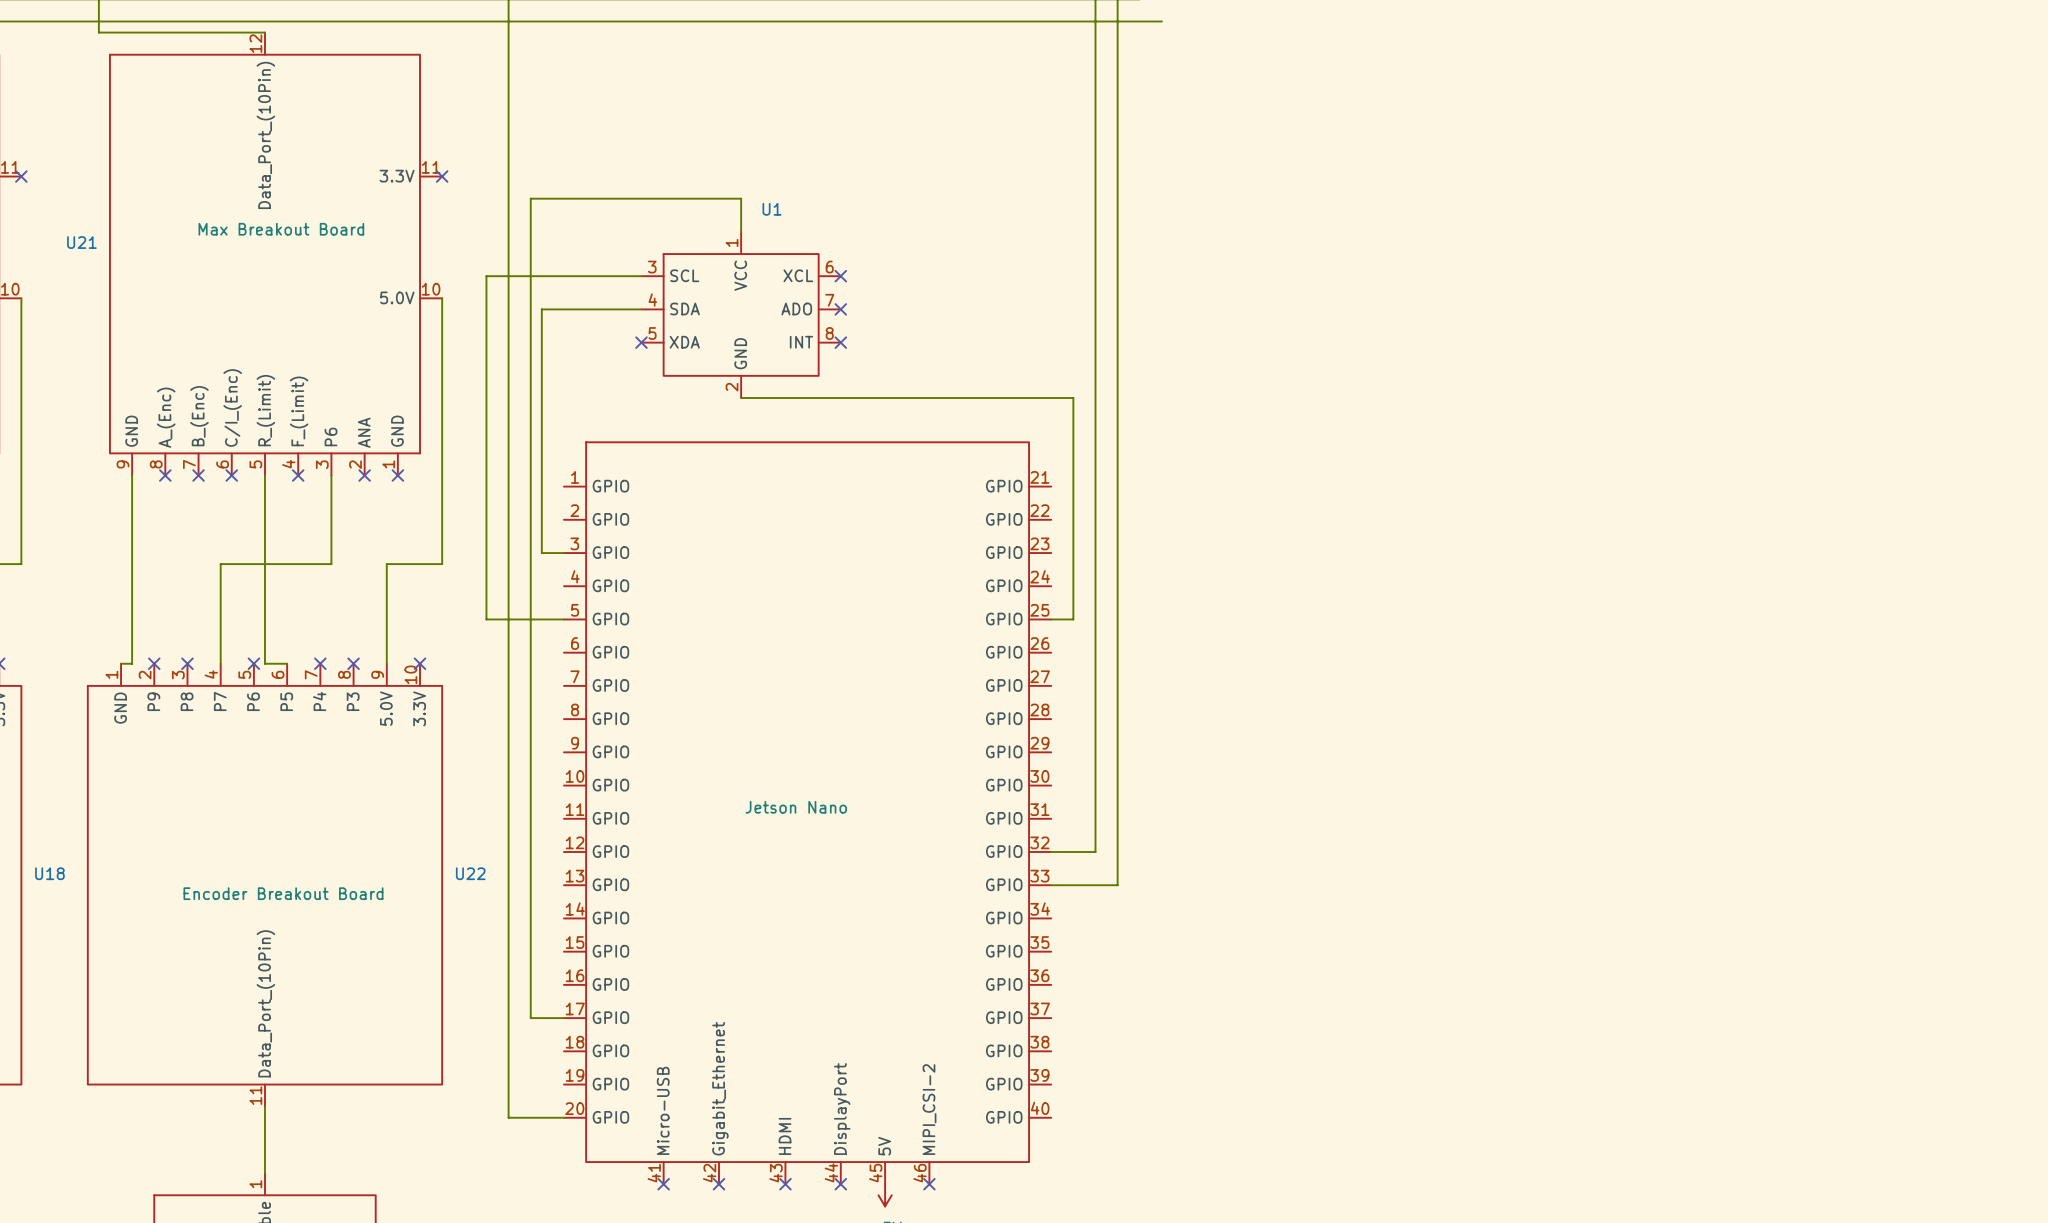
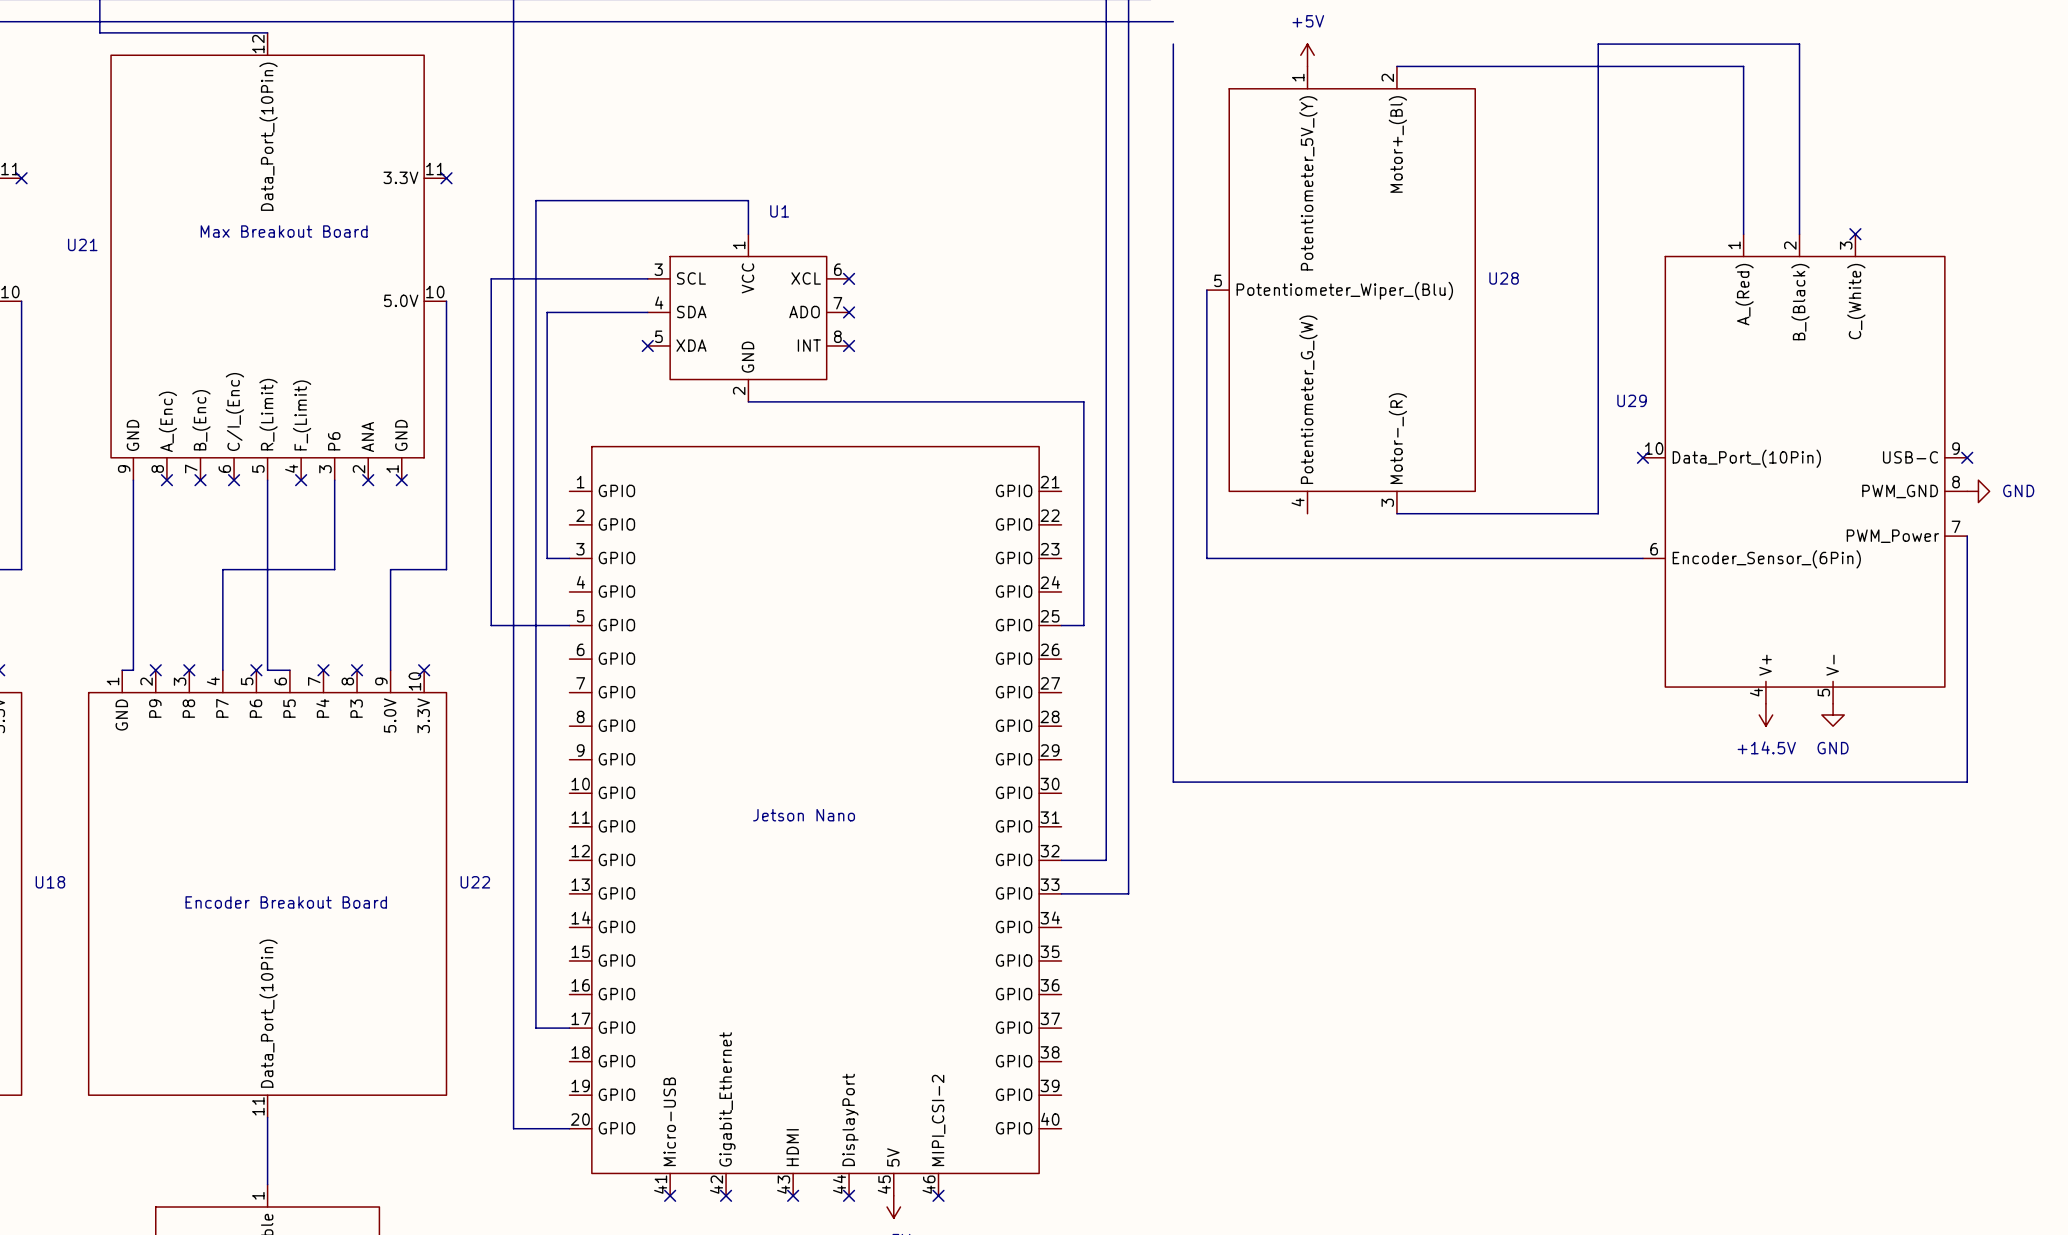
wire: none -> (1173, 44) (1173, 782) (1967, 782) (1967, 536)
power symbol: none -> +5V (1307, 55)
wire: none -> (1396, 66) (1743, 66) (1743, 234)
wire: none -> (1799, 234) (1799, 44) (1598, 44) (1598, 513) (1396, 513)
no-connect mark: none -> (1855, 234)
wire: none -> (1206, 290) (1206, 558) (1642, 558)
U28: none -> (1341, 290)
no-connect mark: none -> (1642, 457)
no-connect mark: none -> (1967, 457)
U29: none -> (1805, 468)
power symbol: none -> GND (1978, 491)
power symbol: none -> +14.5V (1765, 714)
power symbol: none -> GND (1833, 714)

